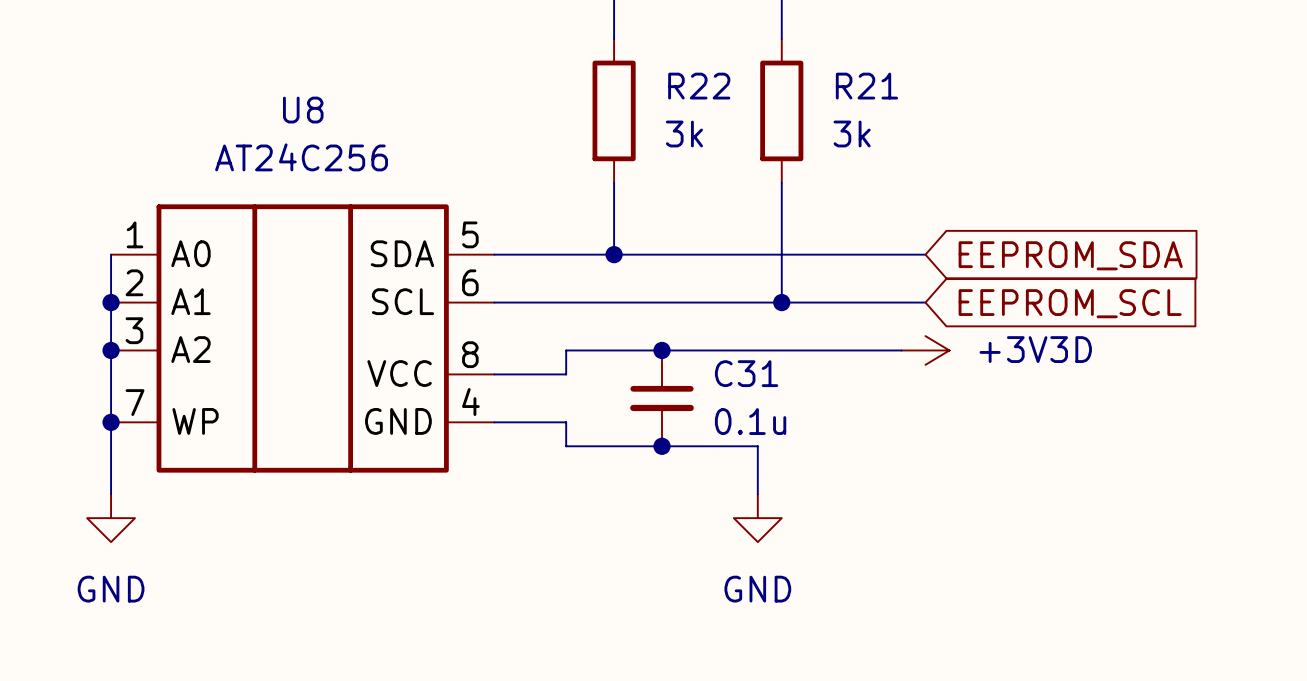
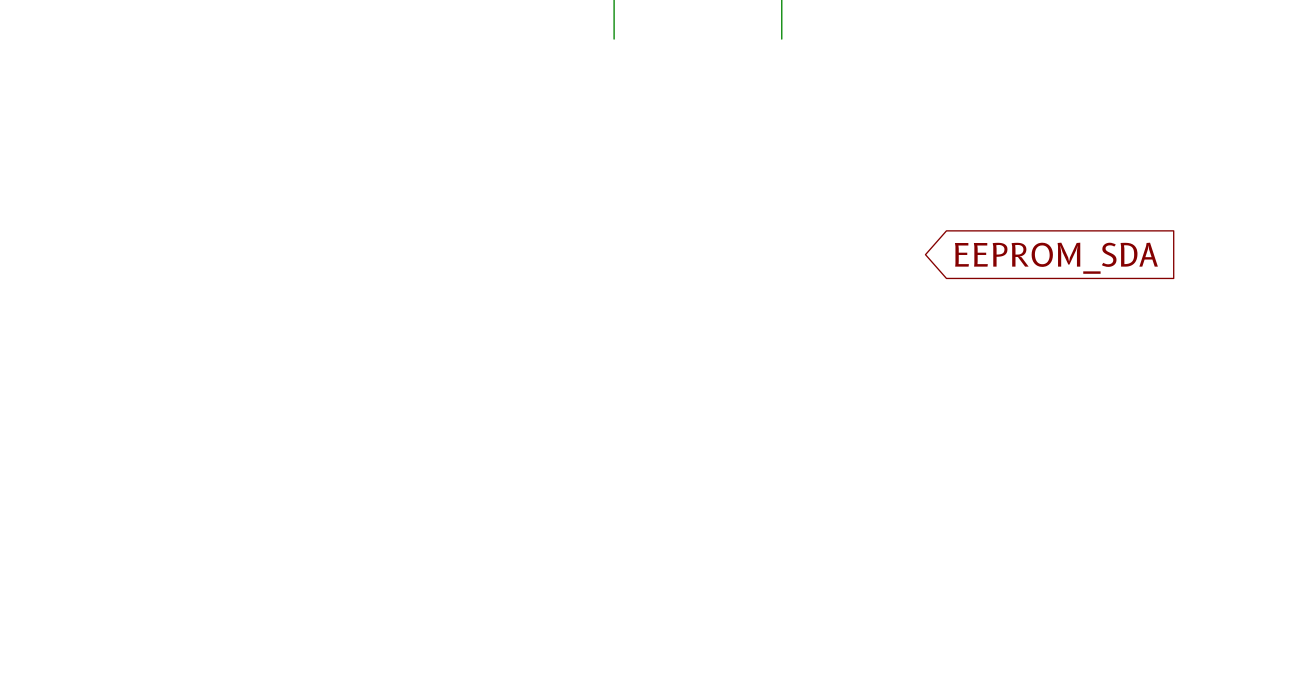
R22: 3k (614, 110) -> none
R21: 3k (781, 110) -> none
wire: (614, 182) (614, 254) -> none
wire: (781, 182) (781, 302) -> none
wire: (111, 254) (111, 494) -> none
wire: (494, 254) (925, 254) -> none
junction: (614, 254) -> none
junction: (111, 302) -> none
wire: (494, 302) (925, 302) -> none
junction: (781, 302) -> none
global label: EEPROM_SCL (1070, 303) -> none
U8: AT24C256 (302, 338) -> none
junction: (111, 350) -> none
junction: (662, 350) -> none
wire: (901, 350) (566, 350) (566, 374) (494, 374) -> none
power symbol: +3V3D (925, 350) -> none
C31: 0.1u (662, 398) -> none
junction: (111, 422) -> none
wire: (494, 422) (566, 422) (566, 446) (757, 446) (757, 494) -> none
junction: (662, 446) -> none
power symbol: GND (111, 518) -> none
power symbol: GND (757, 518) -> none

